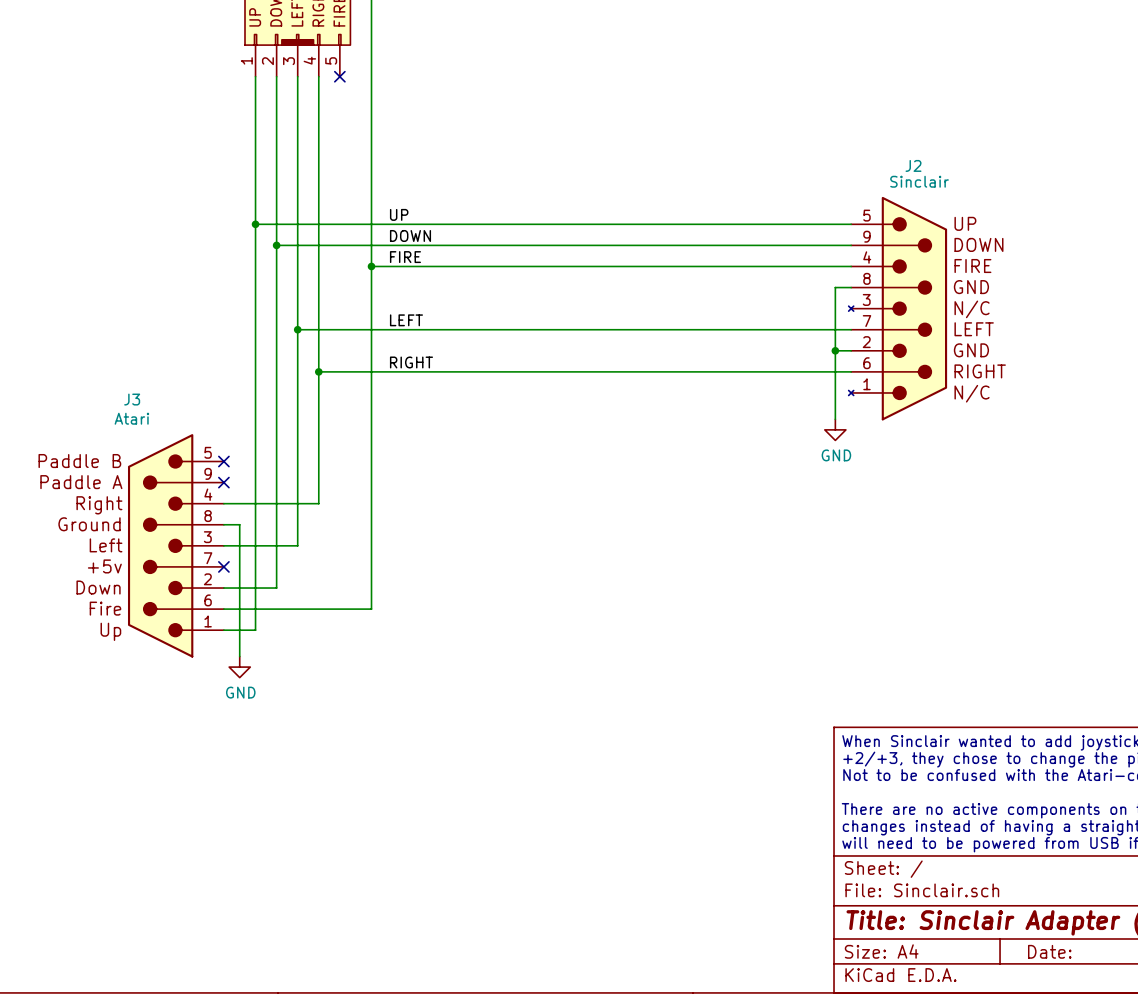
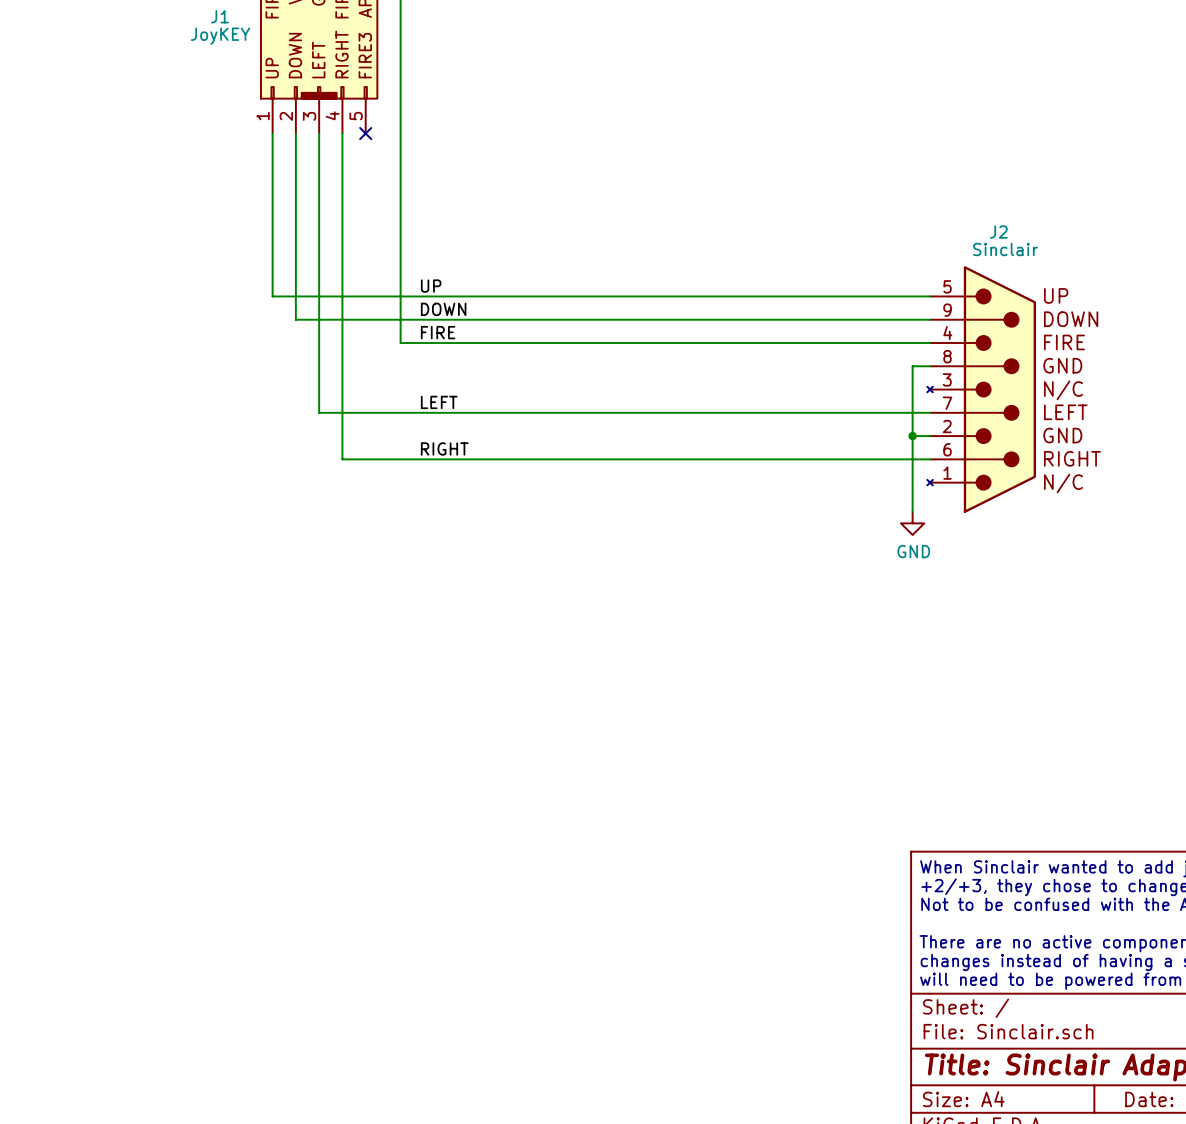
wire: (255, 224) (255, 630) (223, 630) -> none
junction: (255, 224) -> none
wire: (276, 245) (276, 588) (223, 588) -> none
junction: (276, 245) -> none
wire: (371, 266) (371, 609) (223, 609) -> none
junction: (371, 266) -> none
wire: (297, 329) (297, 545) (223, 545) -> none
junction: (297, 329) -> none
wire: (318, 371) (318, 503) (223, 503) -> none
junction: (318, 371) -> none
no-connect mark: (223, 461) -> none
no-connect mark: (223, 482) -> none
wire: (223, 524) (239, 524) (239, 656) -> none
J3: Atari (175, 545) -> none
no-connect mark: (223, 566) -> none
power symbol: GND (239, 667) -> none

